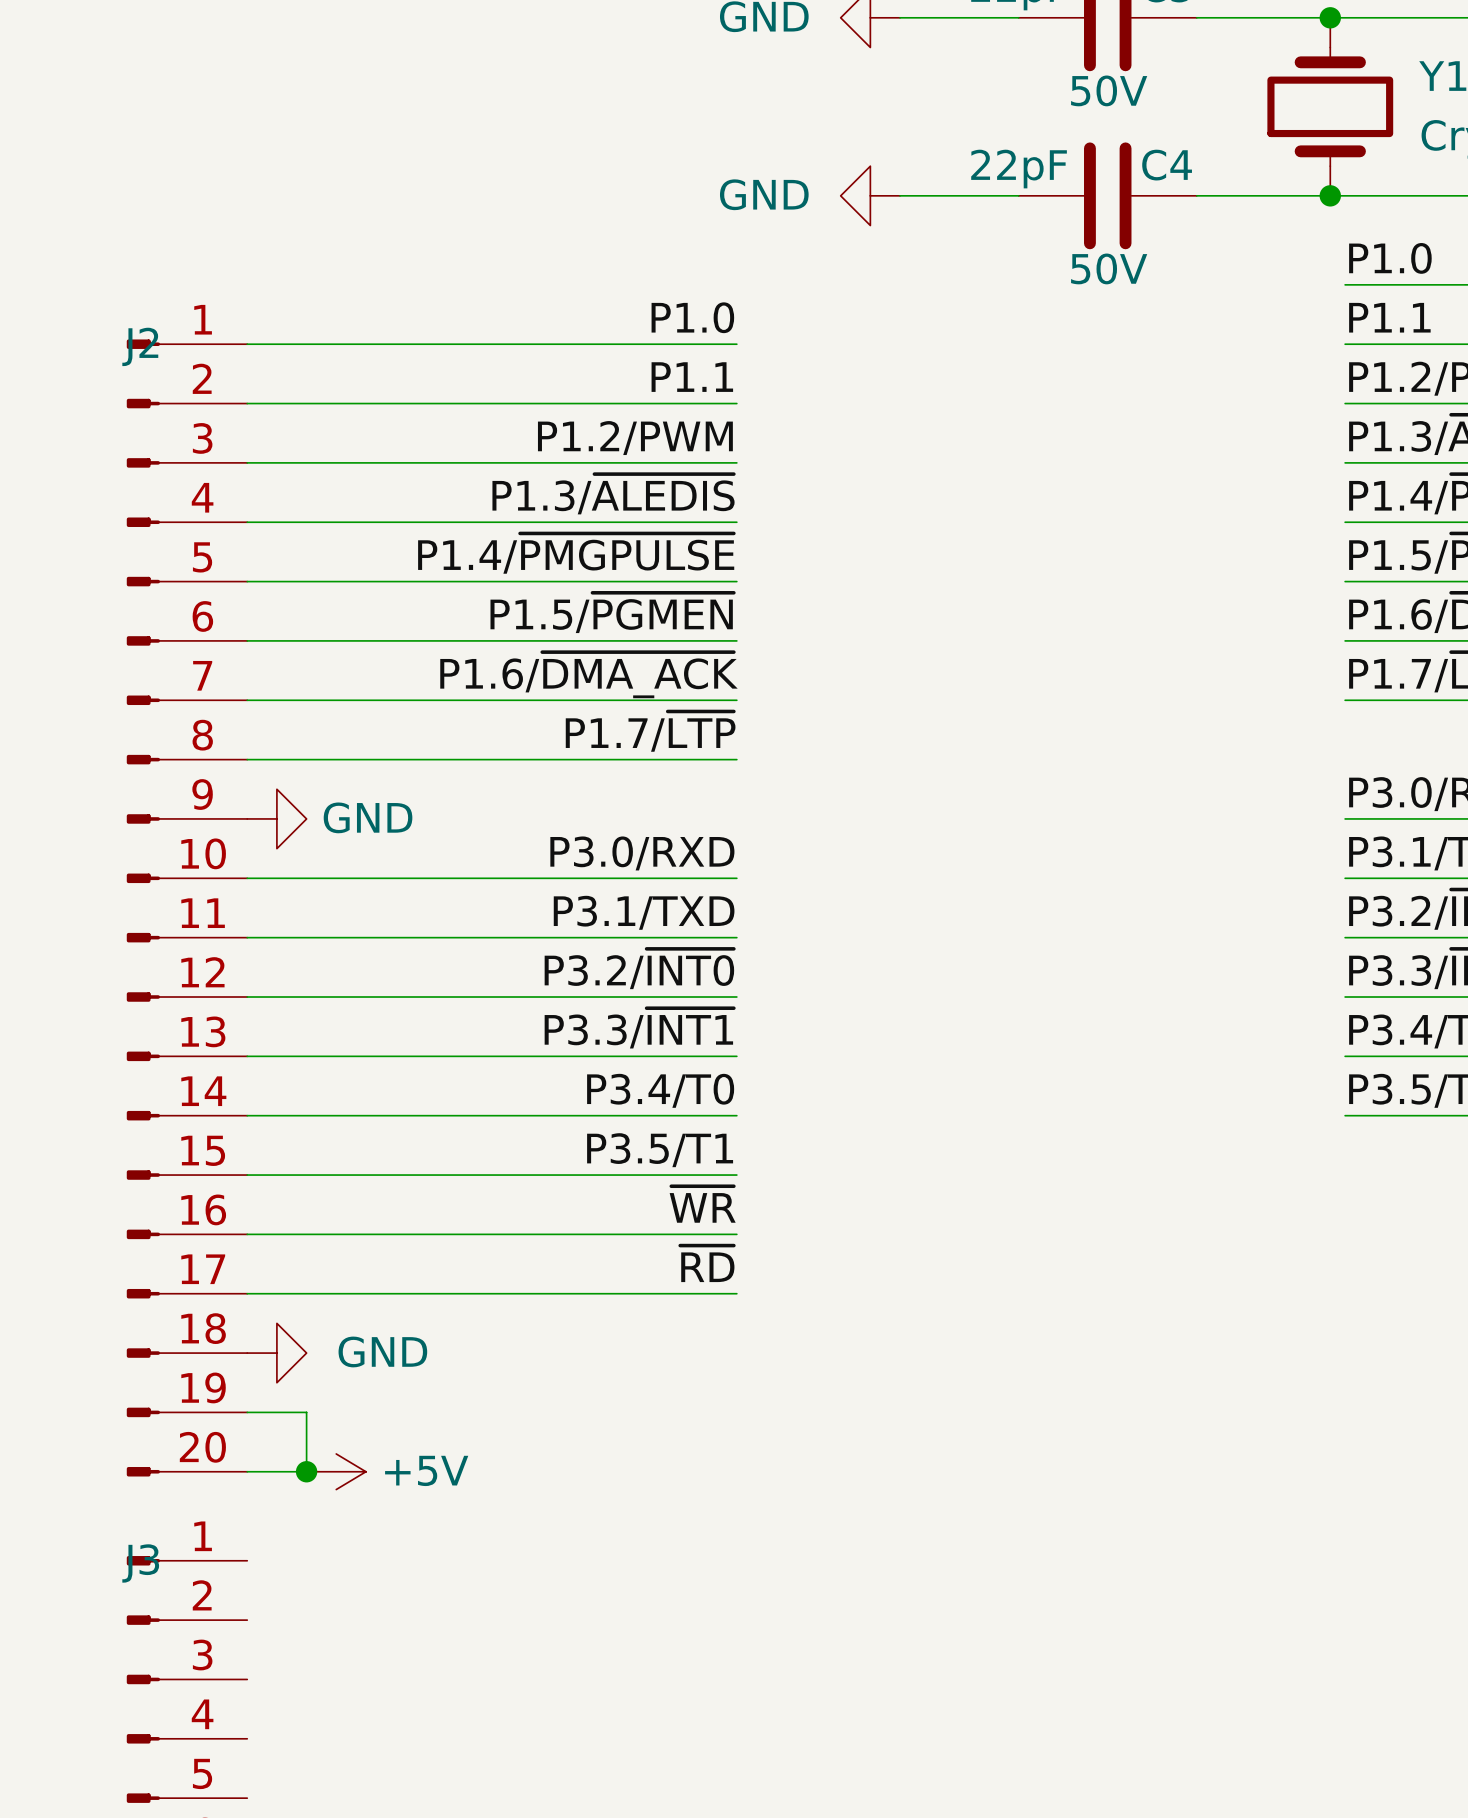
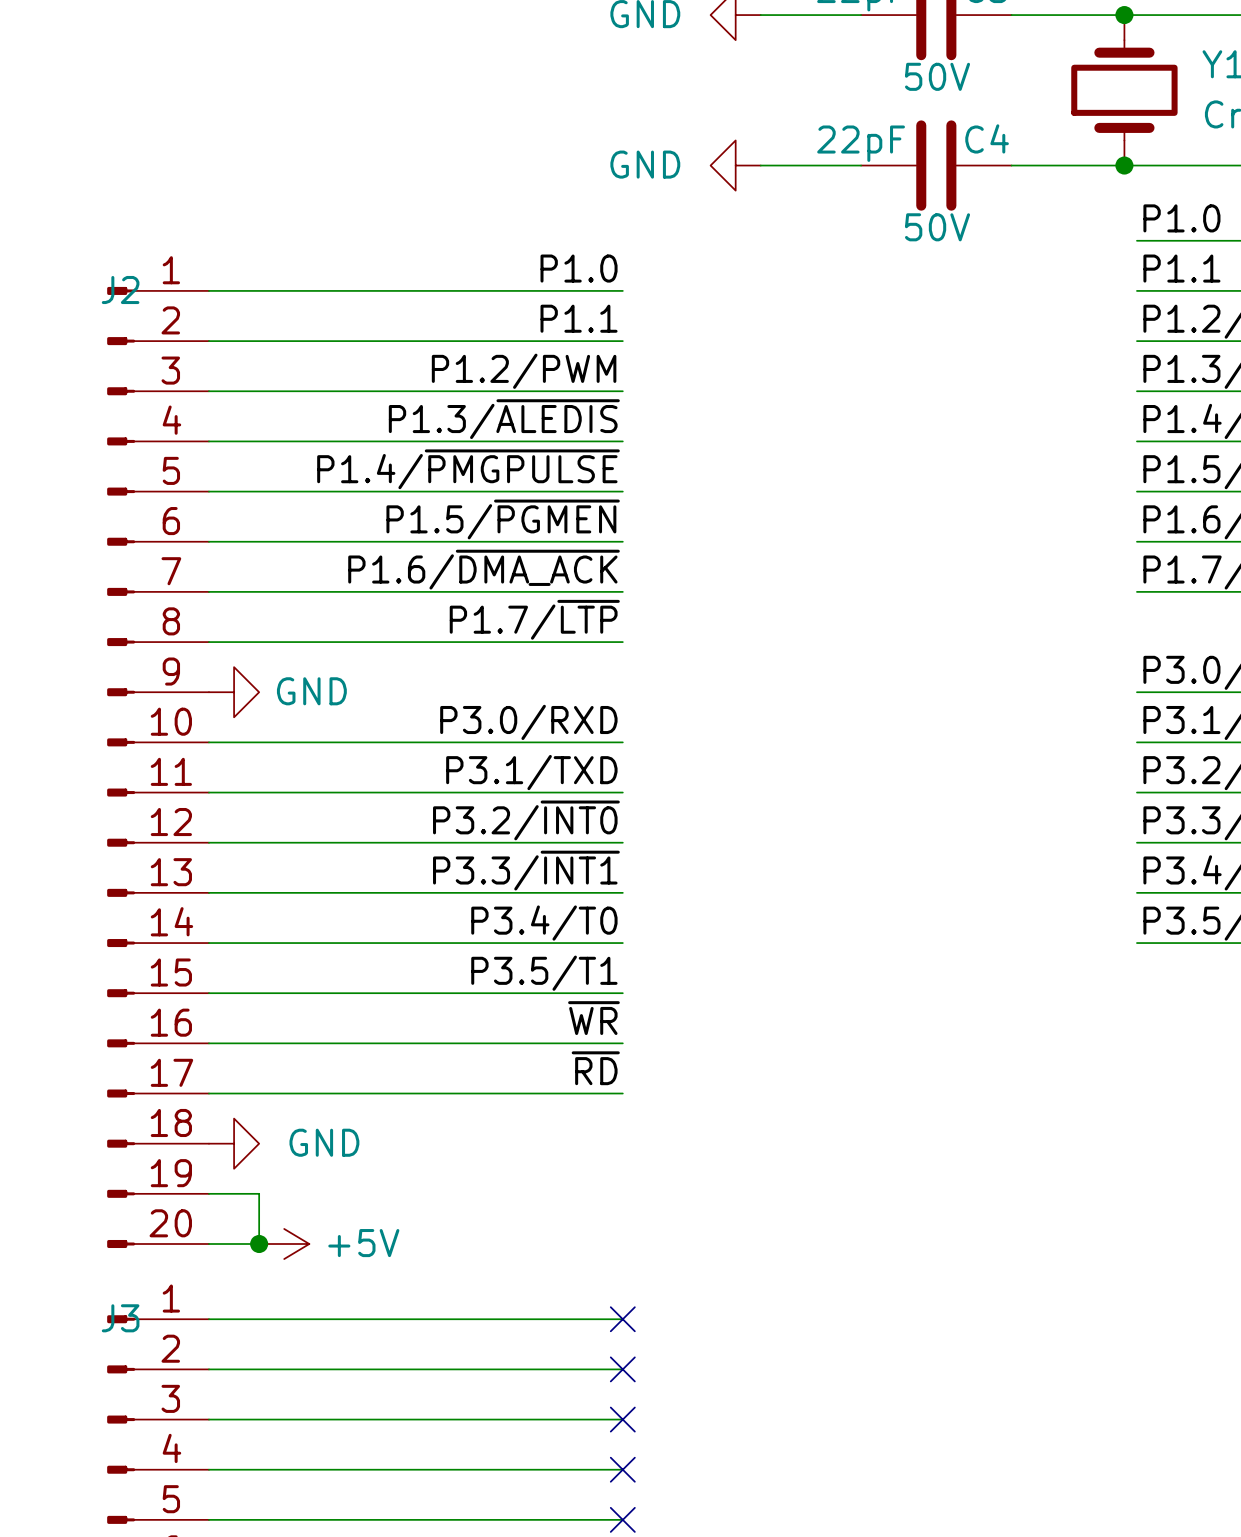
wire: none -> (208, 1319) (622, 1319)
no-connect mark: none -> (622, 1319)
wire: none -> (208, 1369) (622, 1369)
no-connect mark: none -> (622, 1369)
wire: none -> (208, 1419) (622, 1419)
no-connect mark: none -> (622, 1419)
wire: none -> (208, 1469) (622, 1469)
no-connect mark: none -> (622, 1469)
wire: none -> (208, 1519) (622, 1519)
no-connect mark: none -> (622, 1519)

